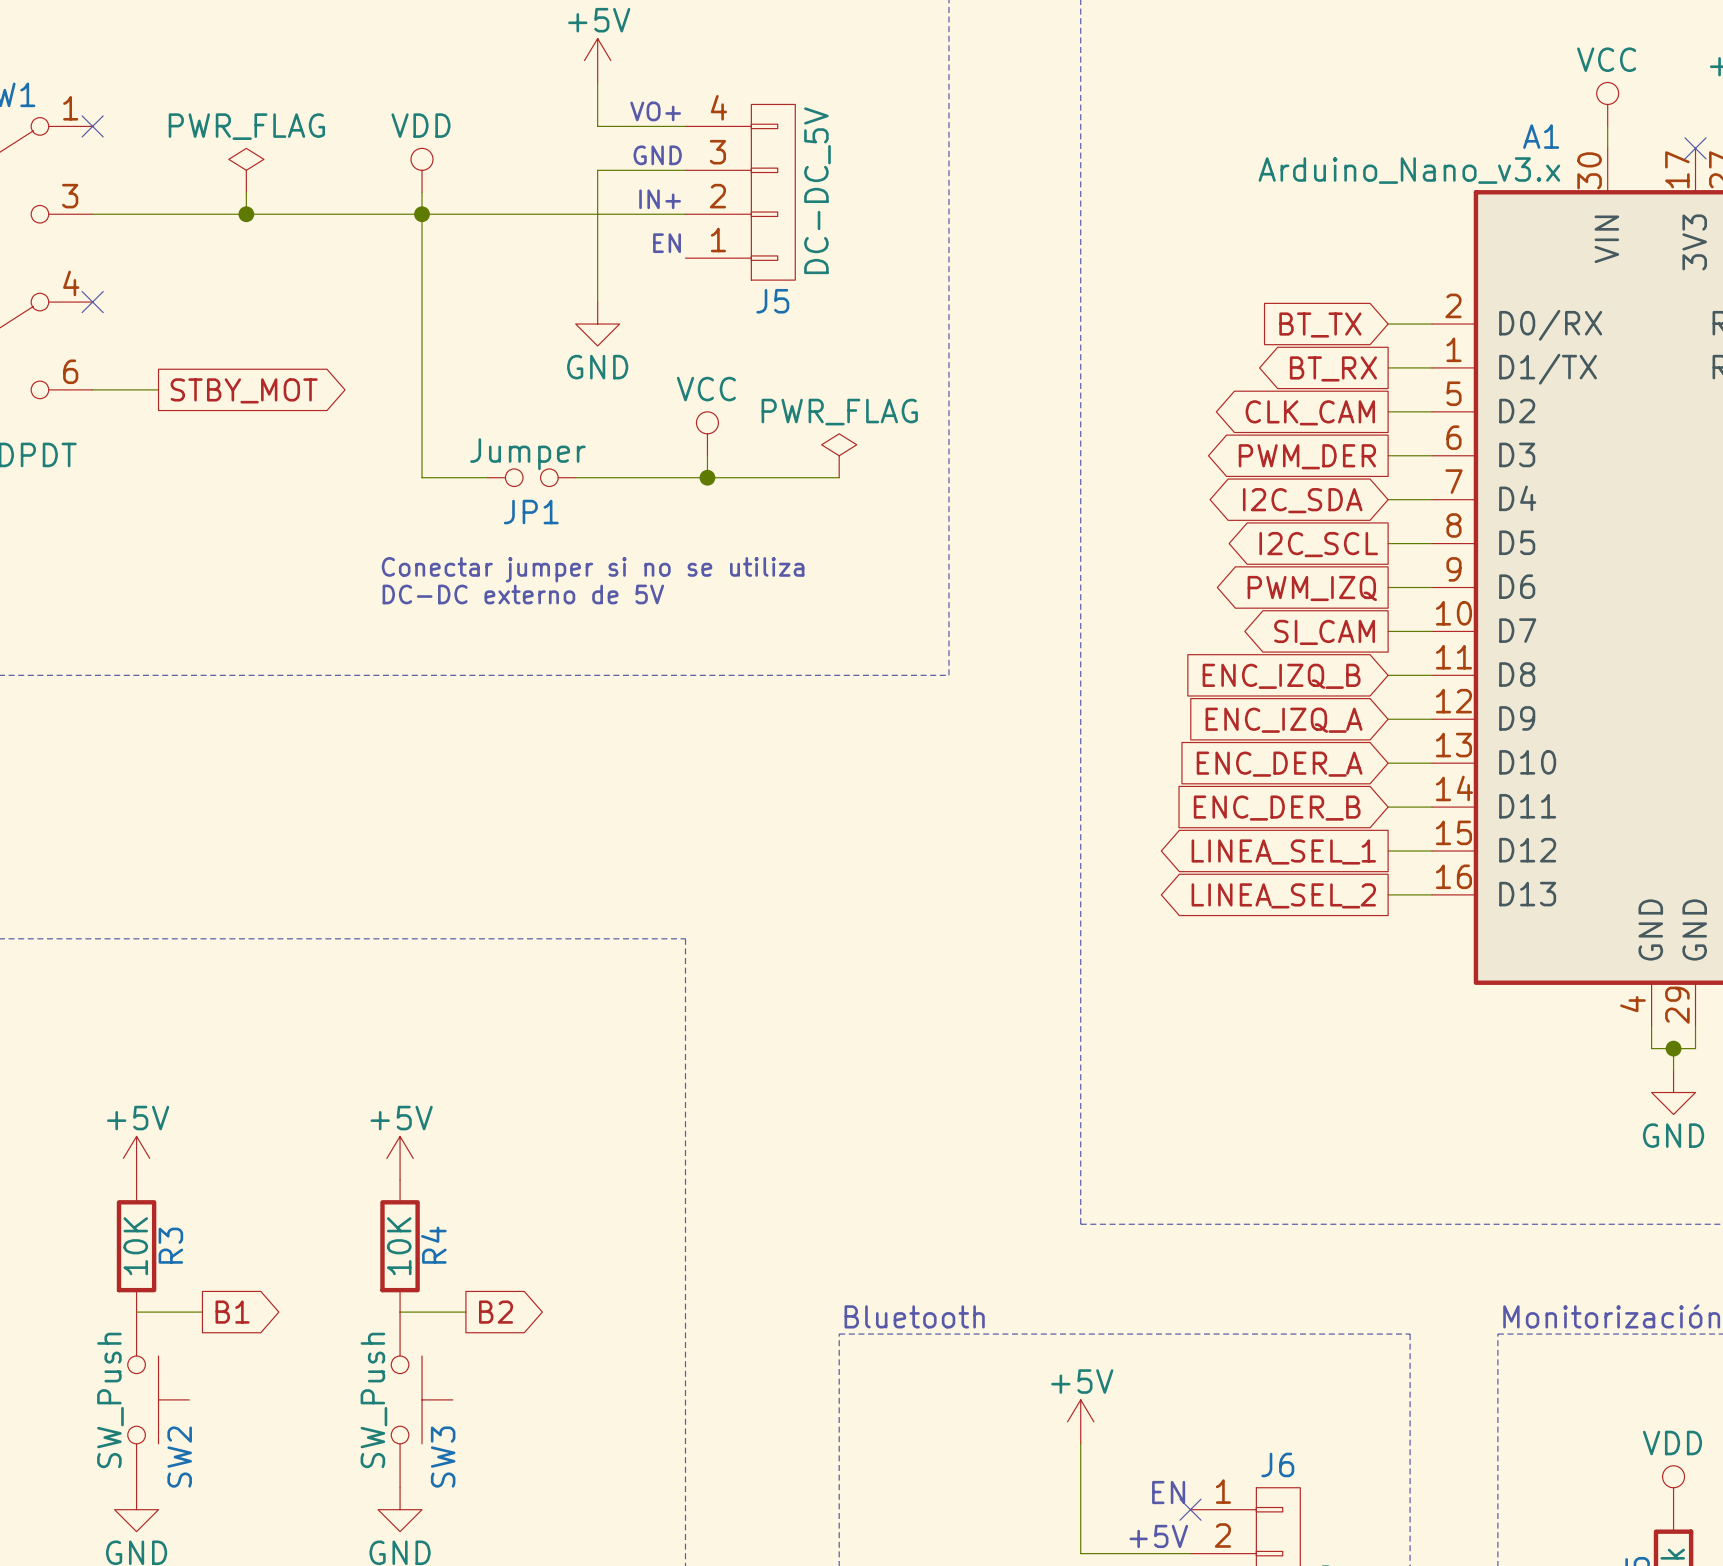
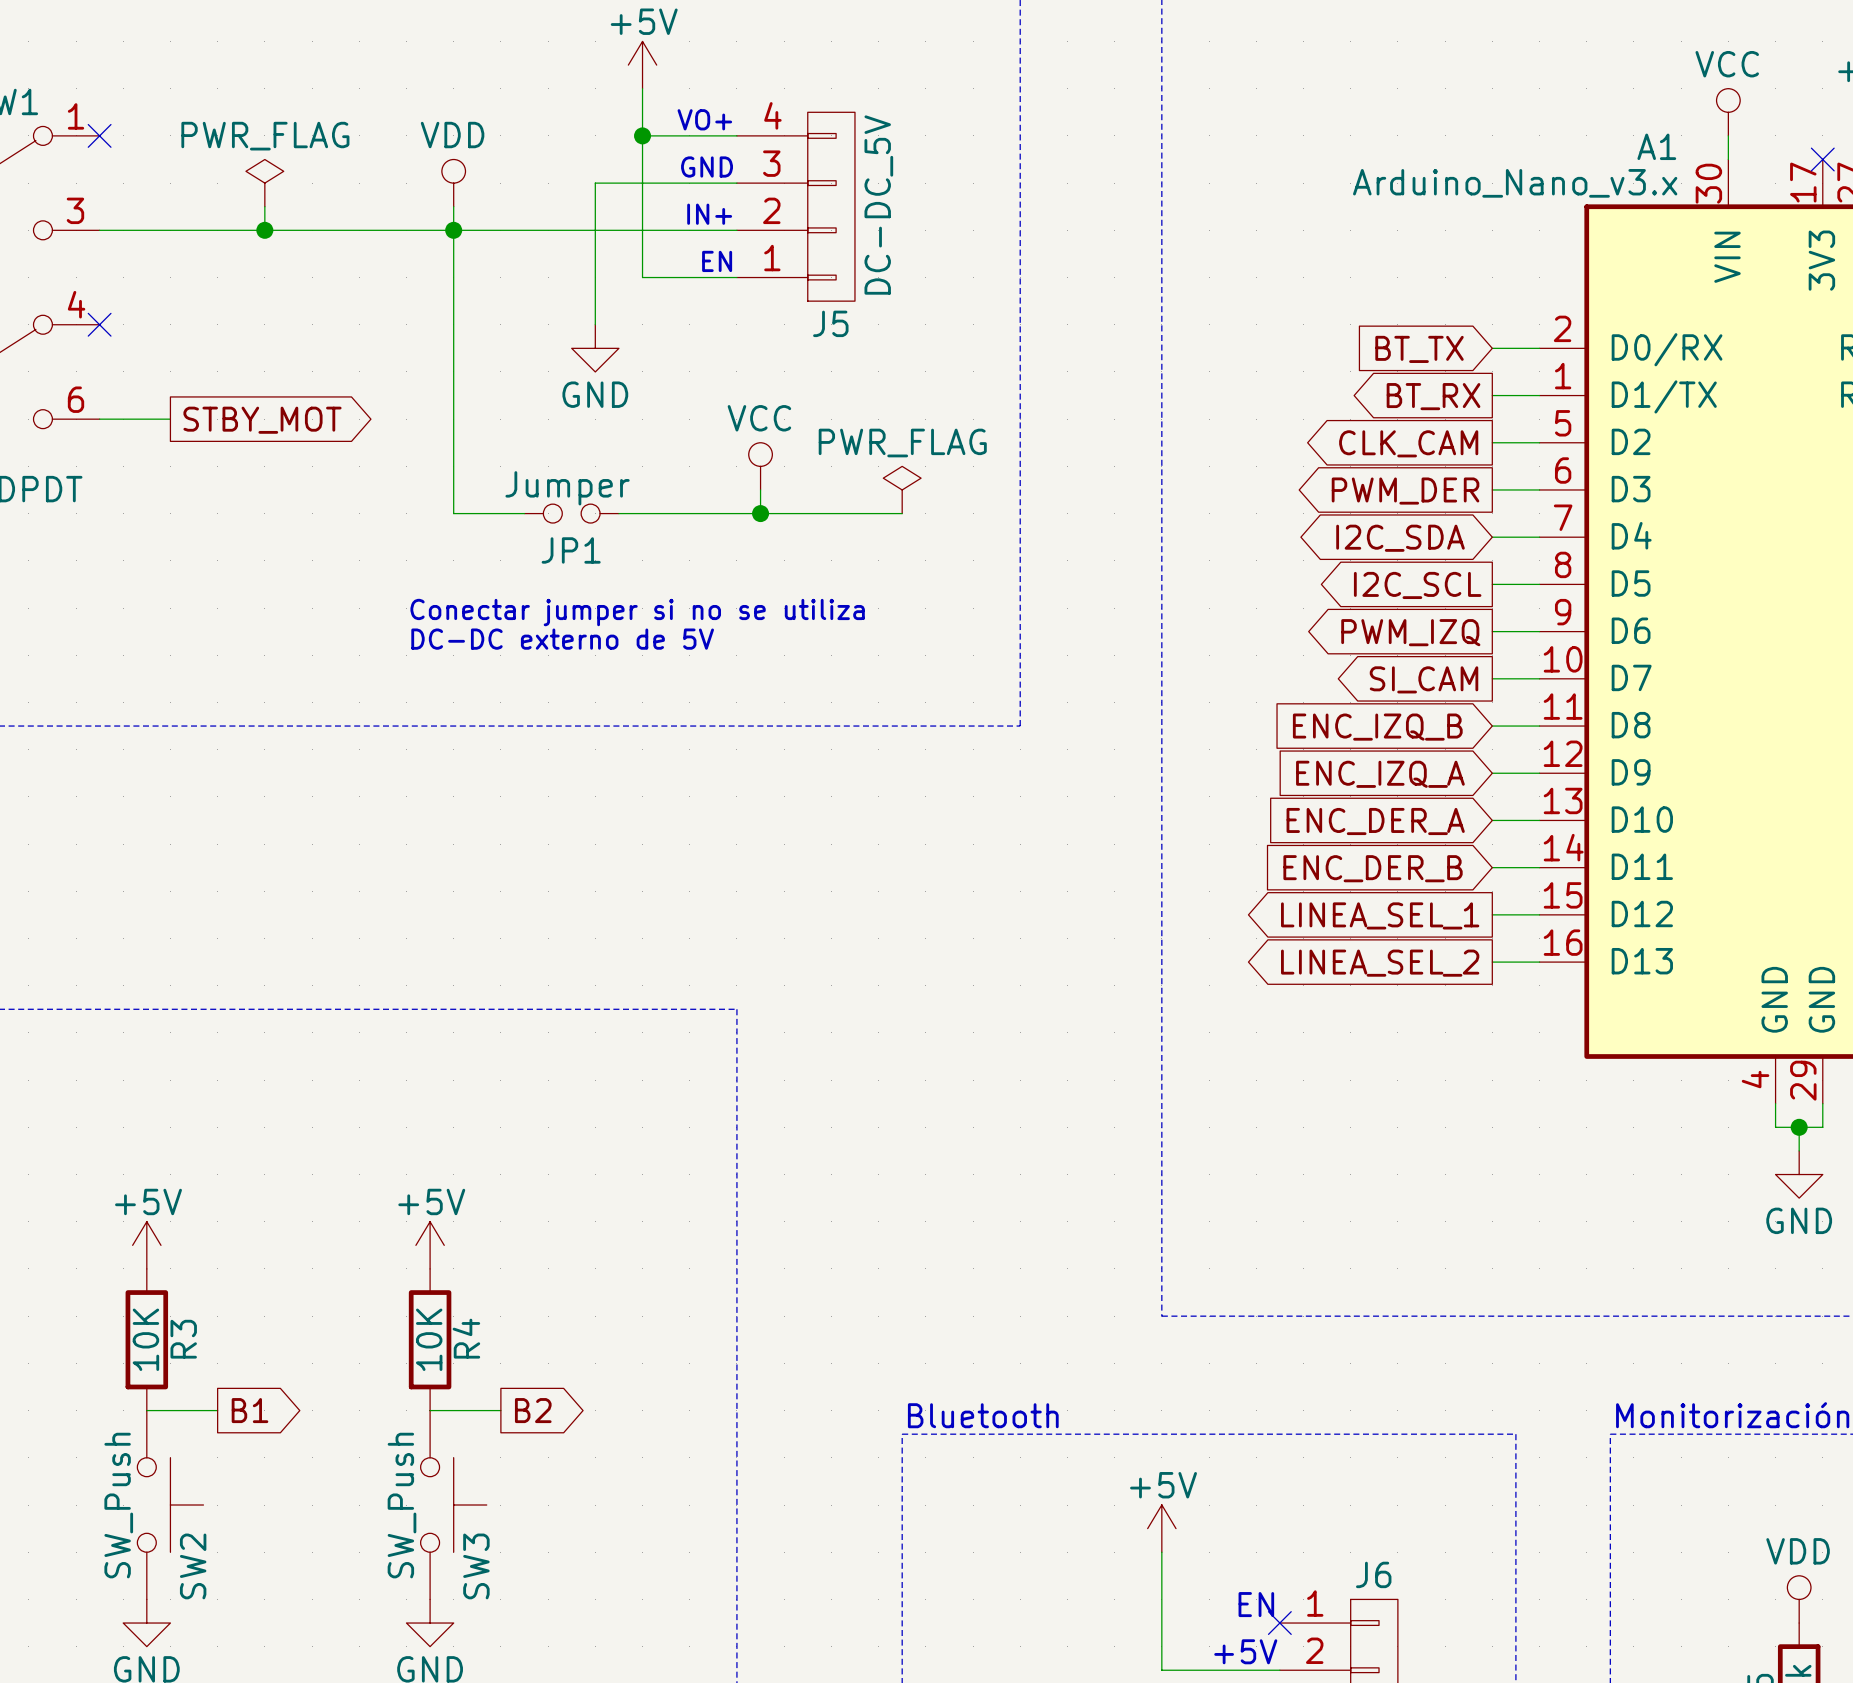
wire: none -> (642, 135) (642, 183) (595, 183) (595, 324)
junction: none -> (642, 135)
wire: (597, 258) (597, 302) -> (642, 277) (736, 277)
power symbol position: GND (597, 324) -> GND (595, 348)

